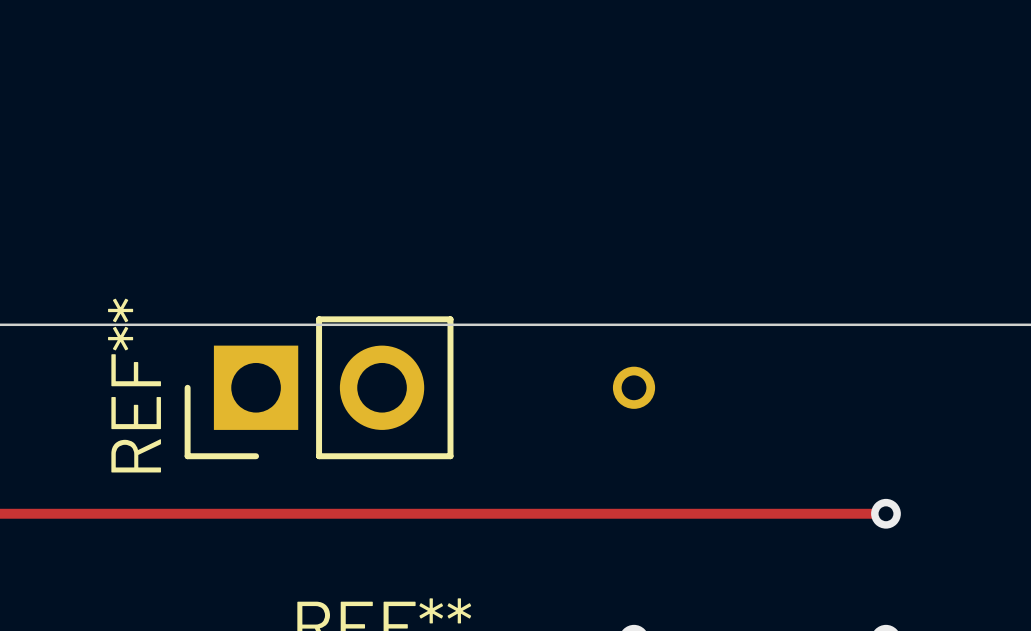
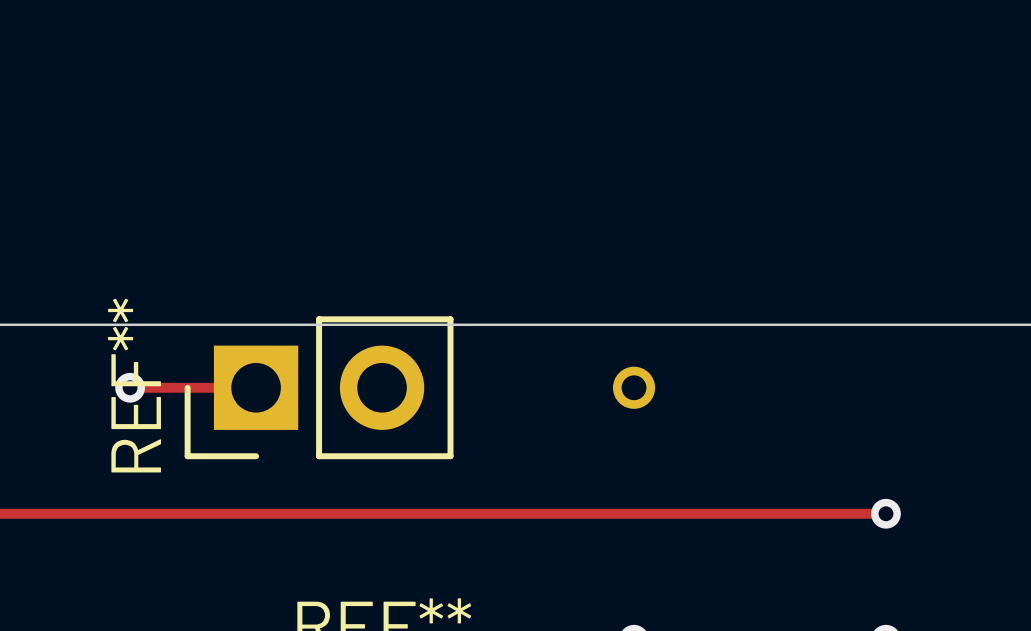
track: none -> (130, 387) (256, 387)
via: none -> (130, 387)

